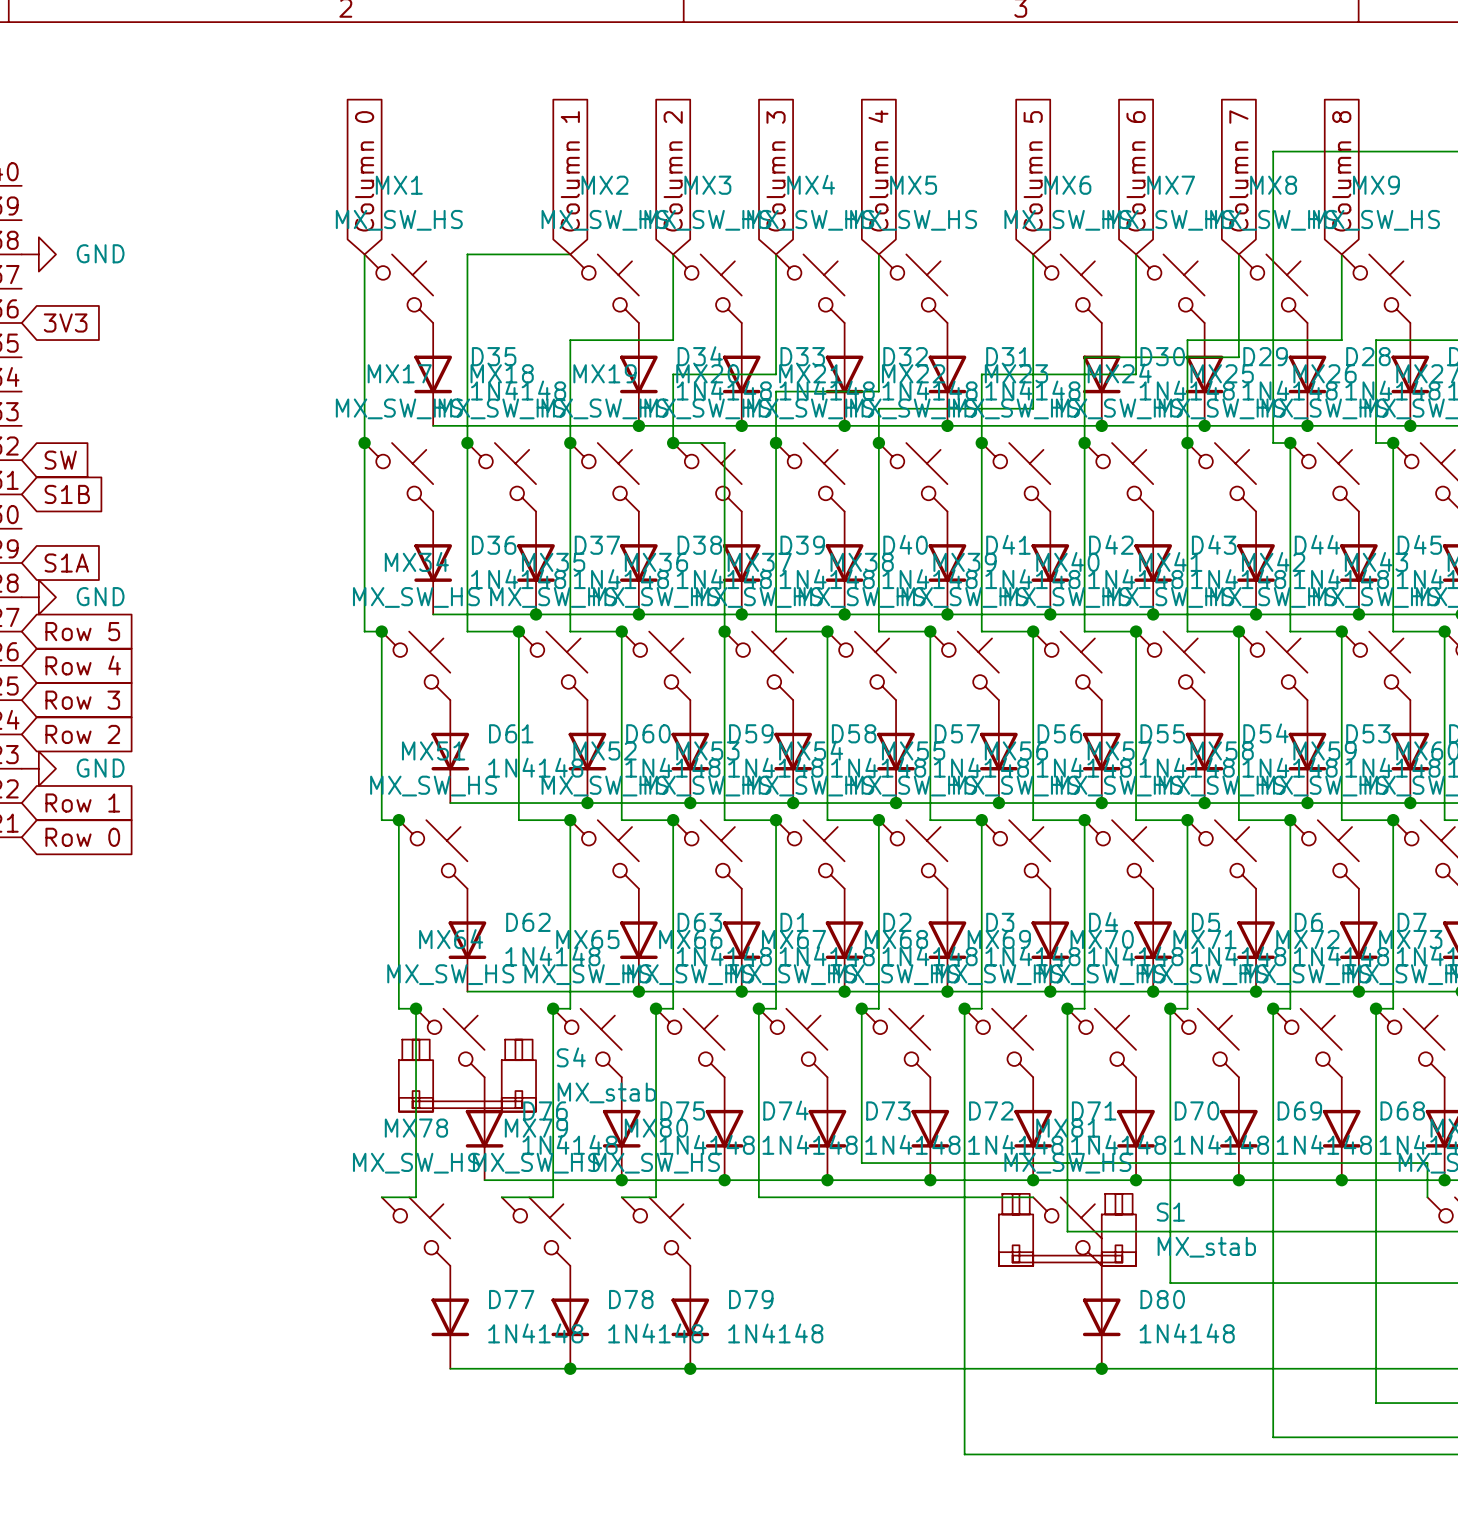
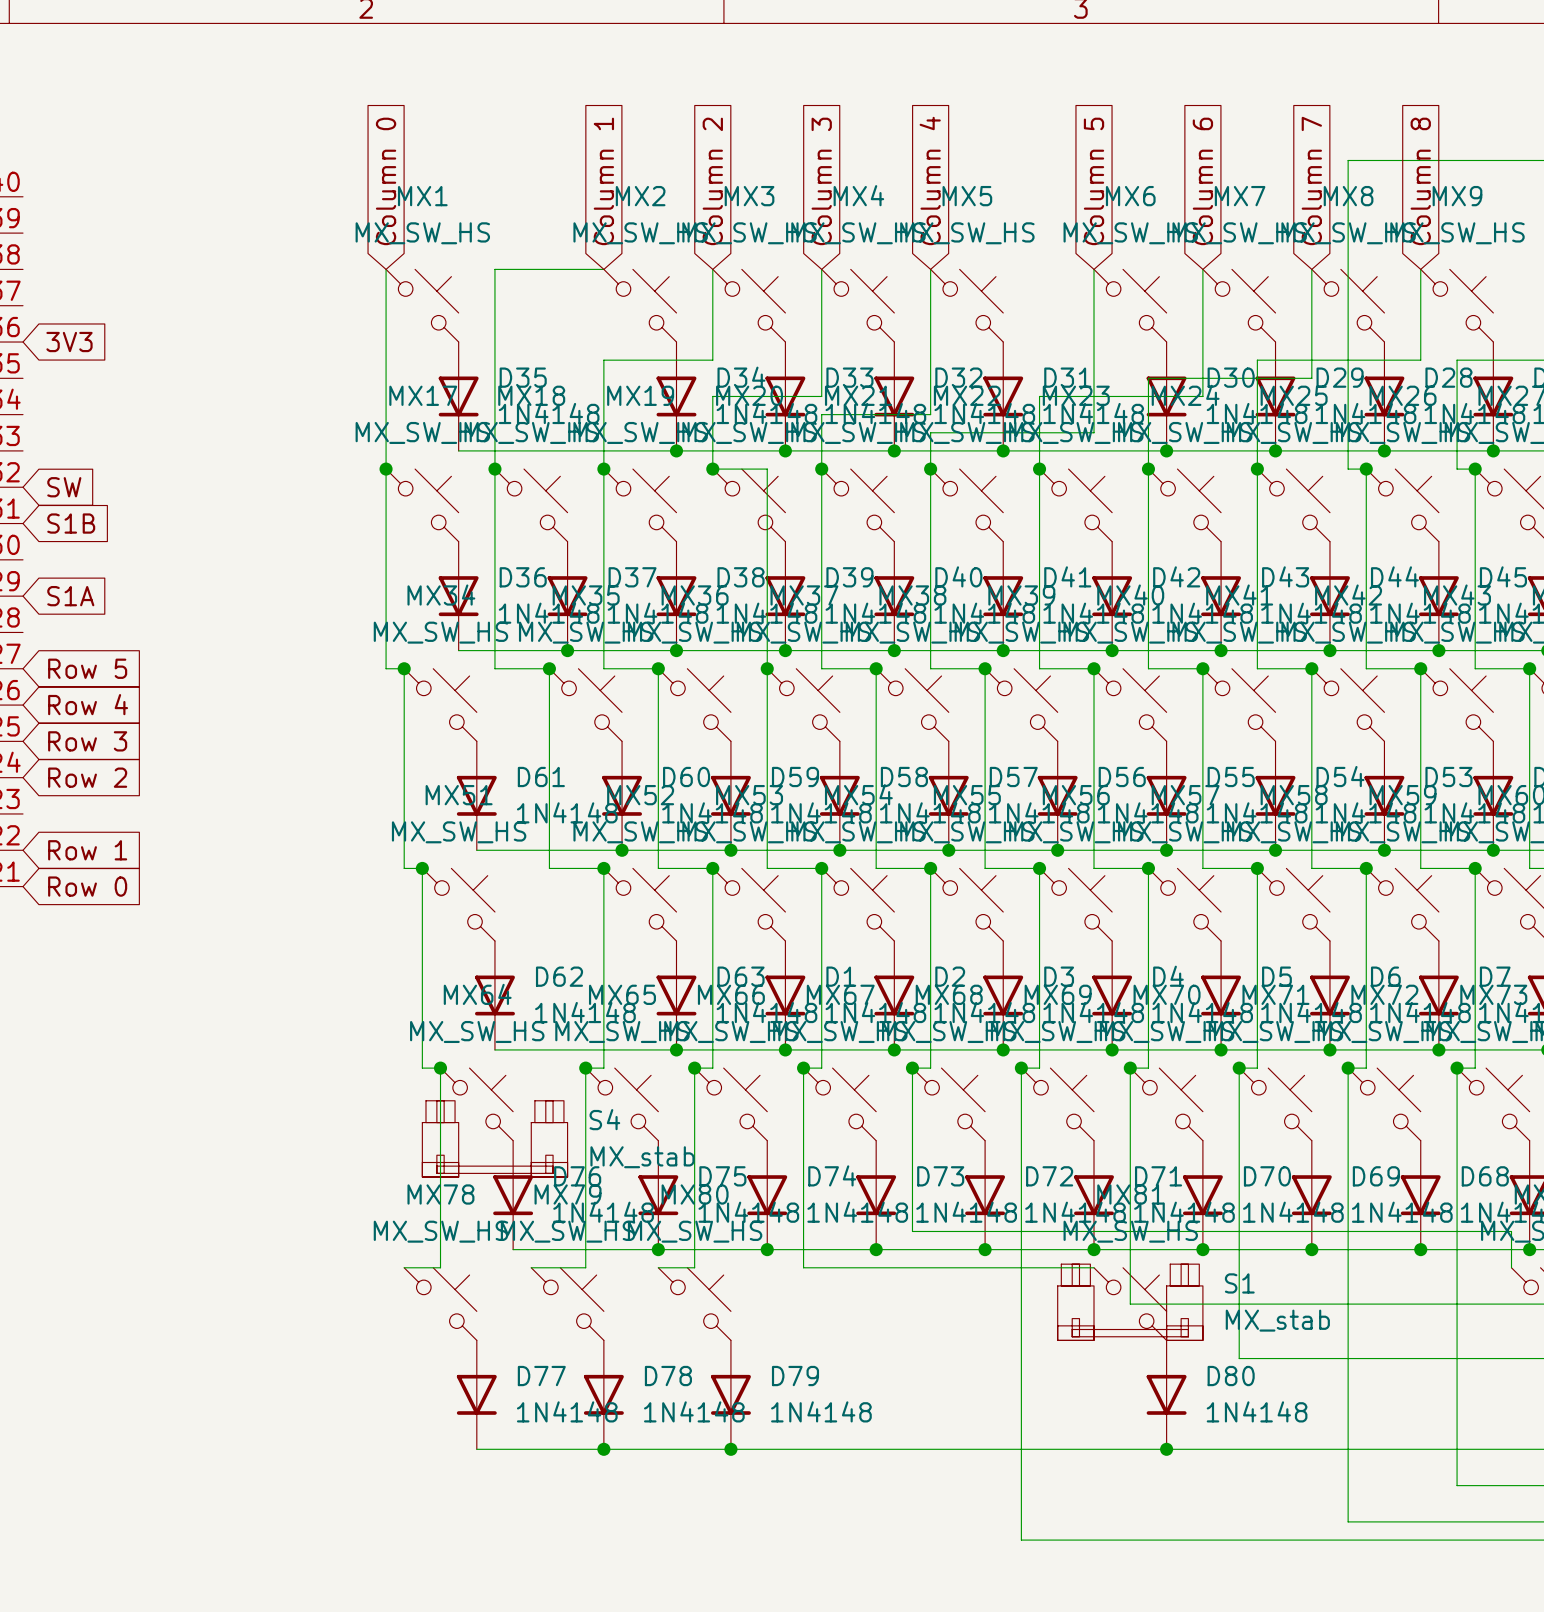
power symbol: GND (38, 254) -> none
power symbol: GND (38, 597) -> none
power symbol: GND (38, 768) -> none

